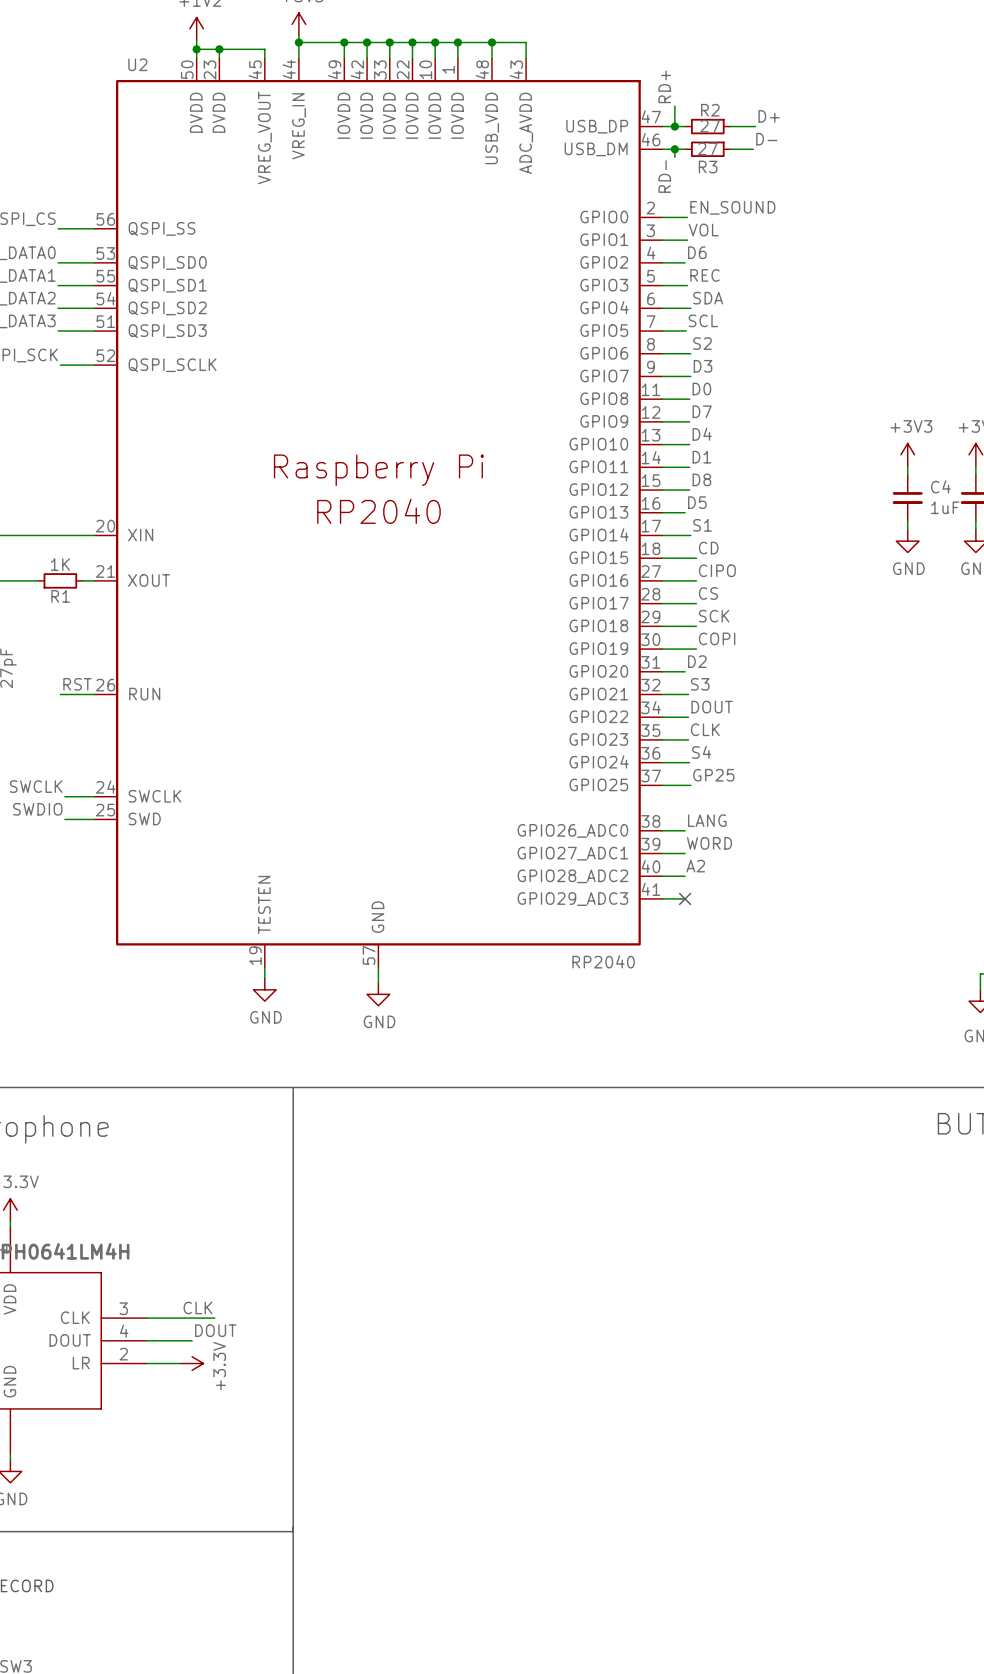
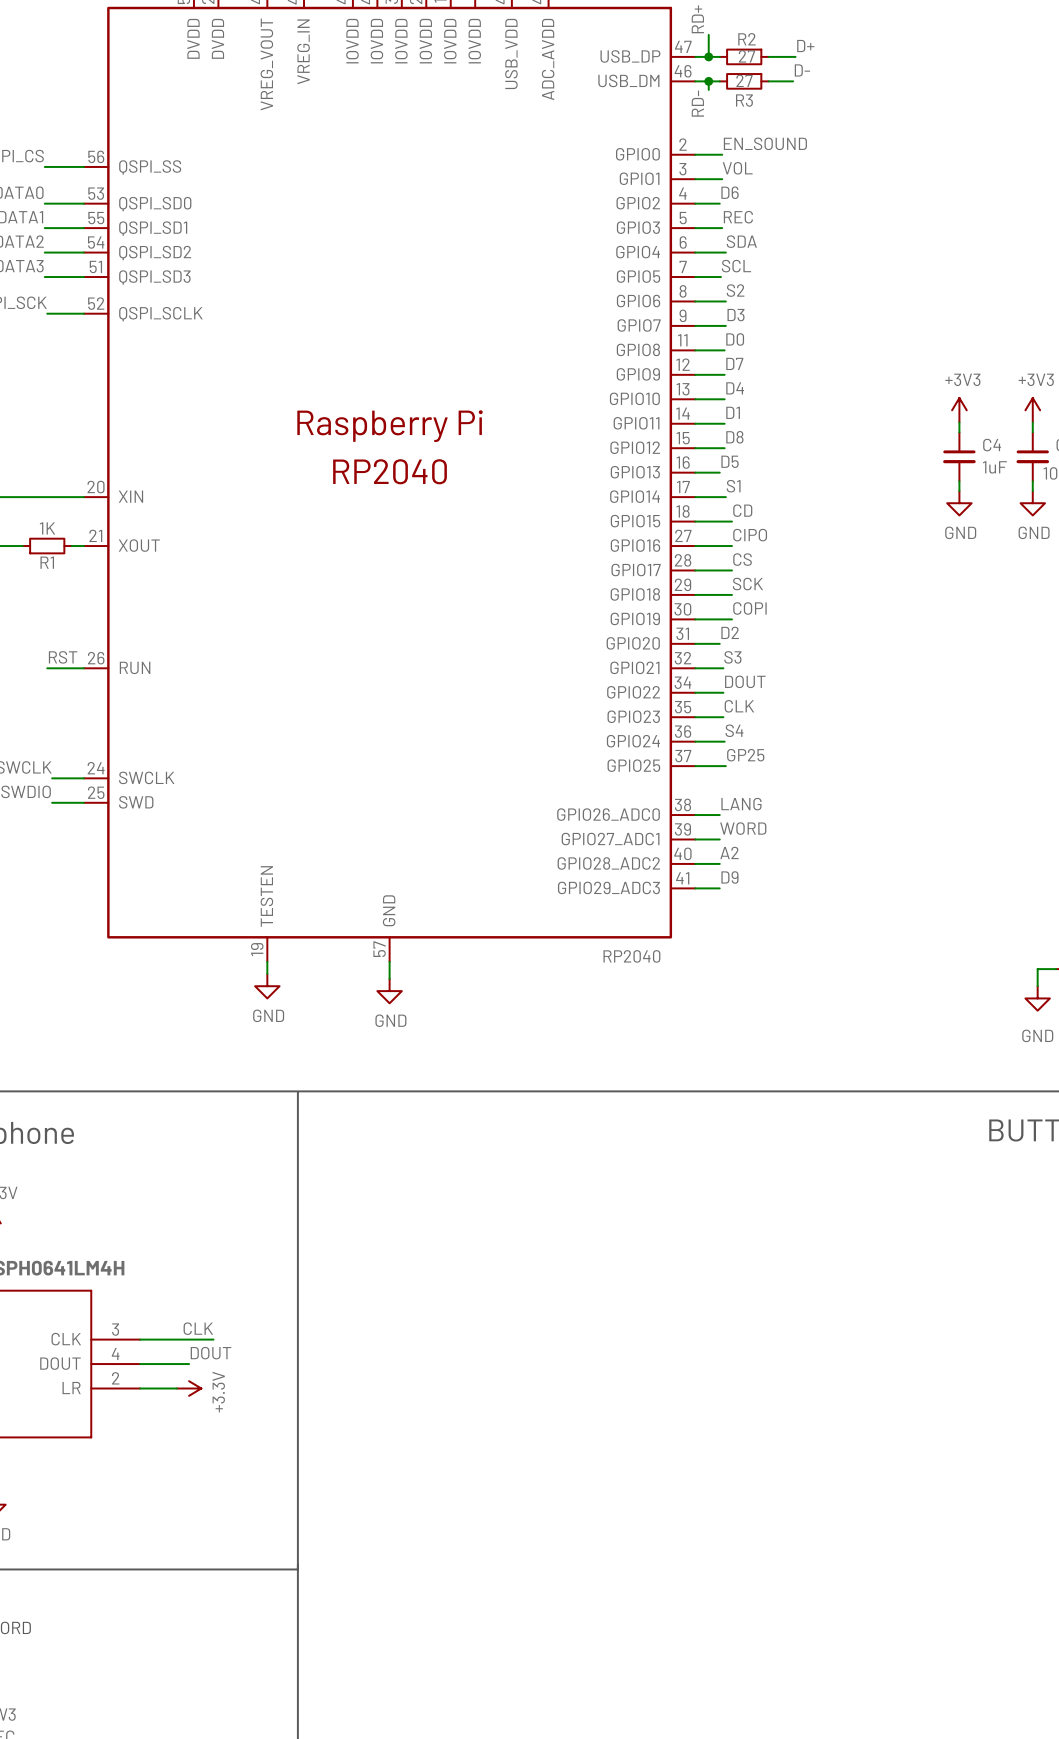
label: none -> D9 (729, 877)
no-connect mark: (685, 898) -> none

